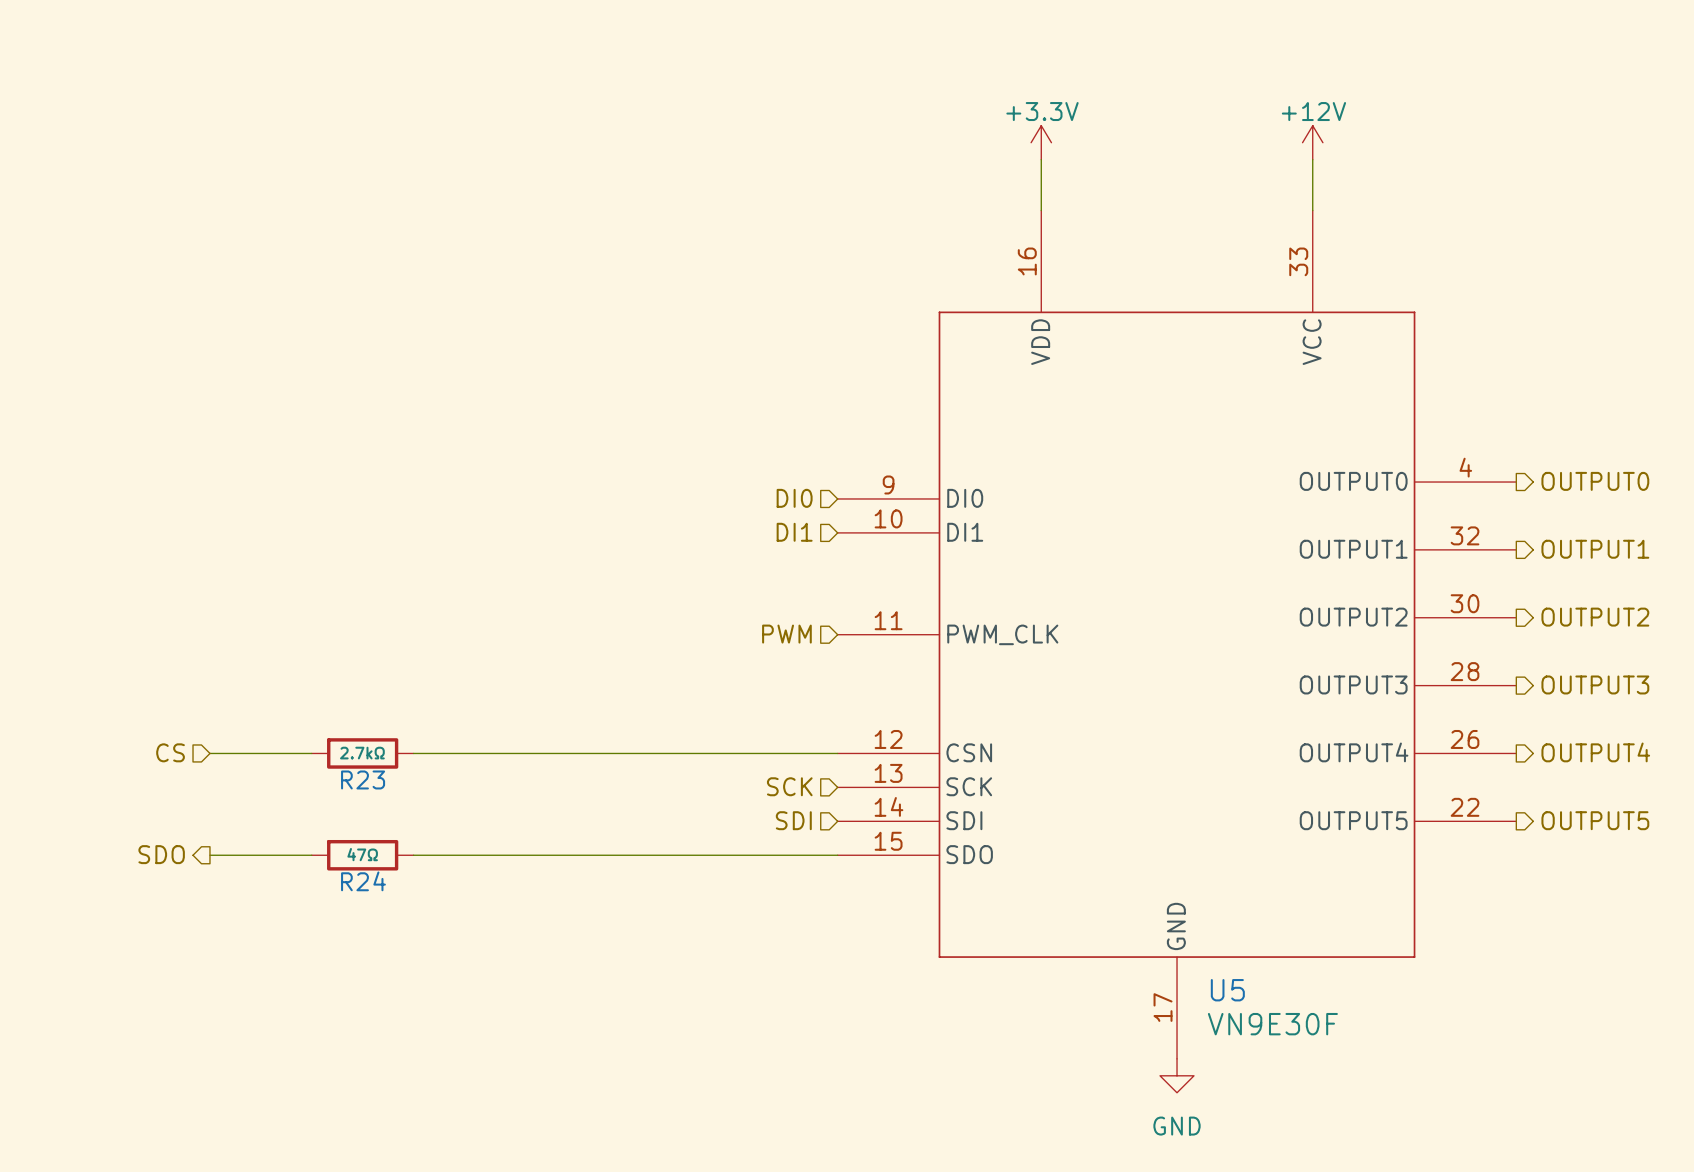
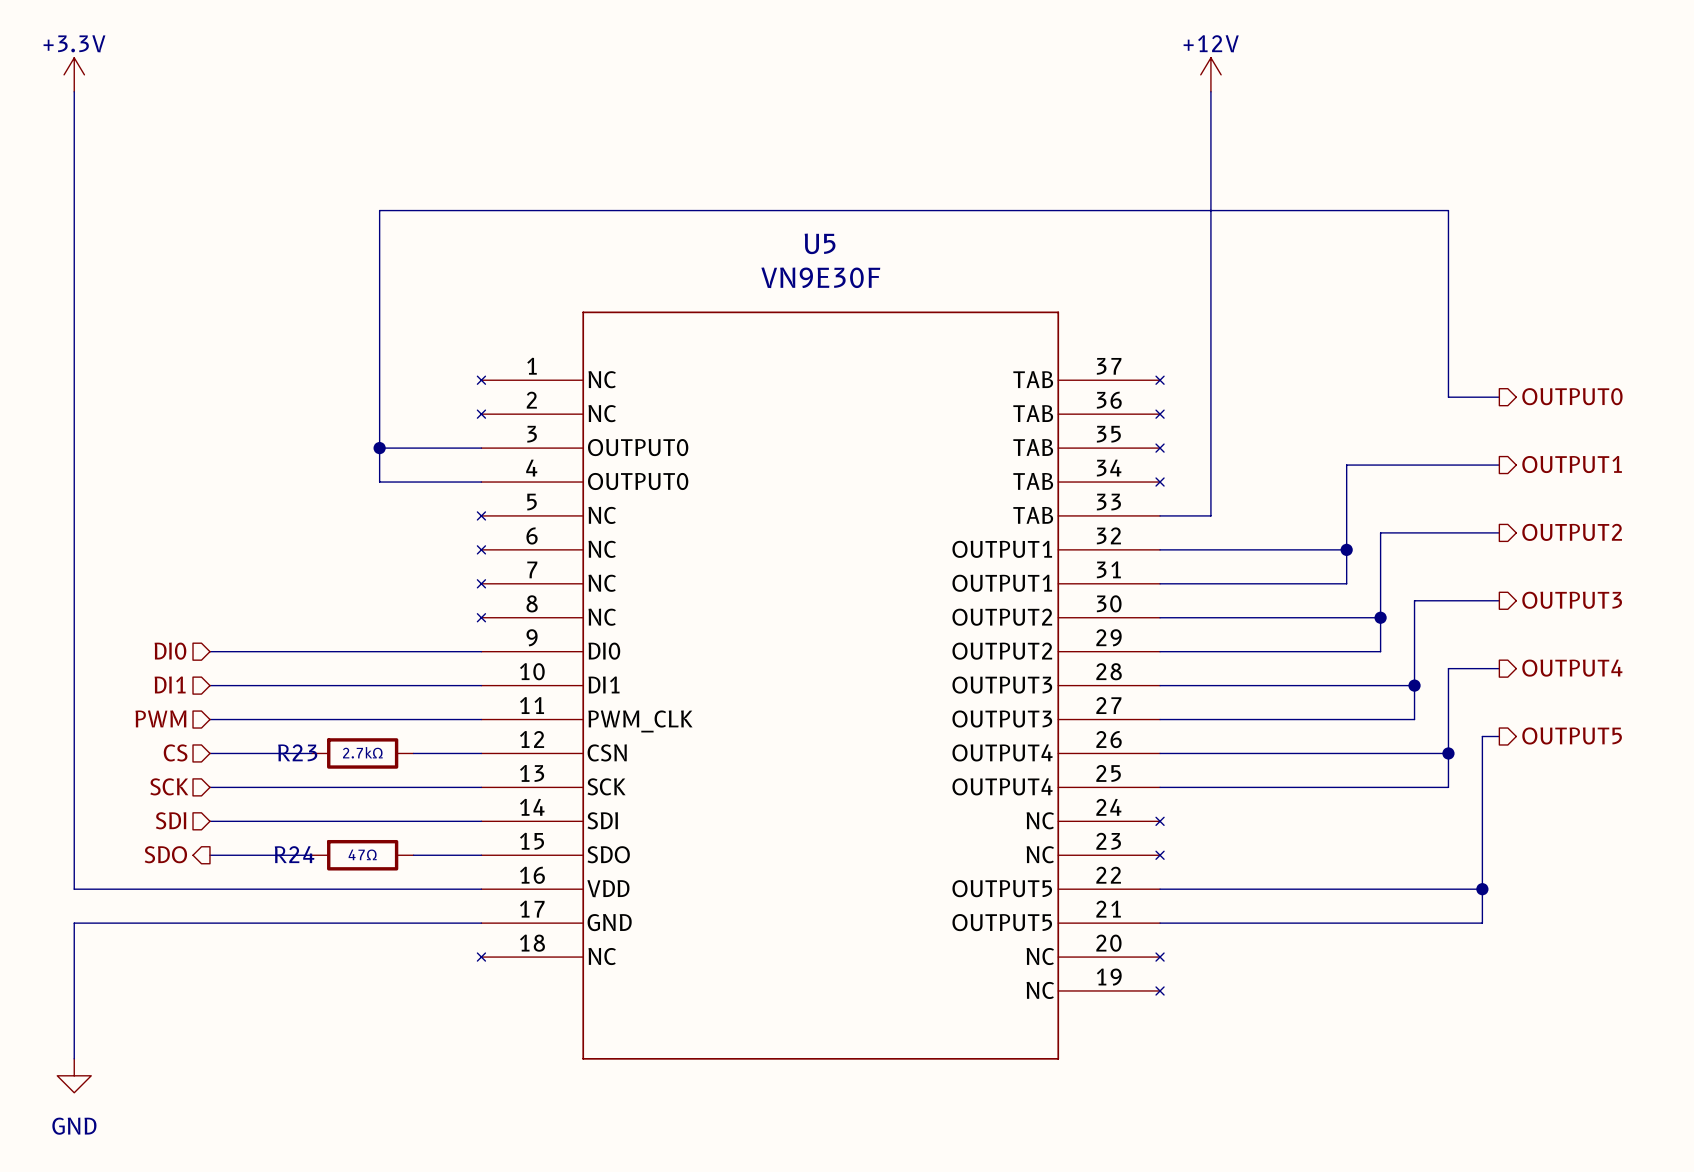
power symbol: none -> +3.3V (74, 74)
wire: none -> (74, 91) (74, 889) (481, 889)
wire: none -> (1210, 91) (1210, 515) (1160, 515)
power symbol: +3.3V (1041, 142) -> none
power symbol position: +12V (1312, 142) -> +12V (1210, 74)
wire: (1041, 159) (1041, 210) -> none
wire: (1312, 159) (1312, 210) -> none
U5 symbol: [837, 210, 1517, 1059] -> [477, 311, 1165, 1060]
wire: none -> (1499, 397) (1448, 397) (1448, 210) (379, 210) (379, 482) (481, 482)
wire: none -> (379, 448) (481, 448)
junction: none -> (379, 448)
wire: none -> (1499, 465) (1346, 465) (1346, 583) (1160, 583)
hierarchical label position: OUTPUT0 (1595, 481) -> OUTPUT0 (1572, 396)
hierarchical label: DI0 (794, 498) -> none
hierarchical label: DI1 (794, 532) -> none
wire: none -> (1499, 532) (1380, 532) (1380, 651) (1160, 651)
wire: none -> (1160, 549) (1346, 549)
junction: none -> (1346, 549)
hierarchical label position: OUTPUT1 (1595, 549) -> OUTPUT1 (1572, 464)
wire: none -> (1499, 600) (1414, 600) (1414, 719) (1160, 719)
wire: none -> (1160, 617) (1380, 617)
junction: none -> (1380, 617)
hierarchical label position: OUTPUT2 (1595, 617) -> OUTPUT2 (1572, 532)
hierarchical label: PWM (786, 634) -> none
hierarchical label: none -> DI0 (170, 651)
wire: none -> (209, 651) (481, 651)
wire: none -> (1499, 668) (1448, 668) (1448, 787) (1160, 787)
hierarchical label: none -> DI1 (170, 684)
hierarchical label position: OUTPUT3 (1595, 684) -> OUTPUT3 (1572, 600)
wire: none -> (209, 685) (481, 685)
wire: none -> (1160, 685) (1414, 685)
junction: none -> (1414, 685)
hierarchical label: none -> PWM (160, 718)
wire: none -> (209, 719) (481, 719)
wire: none -> (1499, 736) (1482, 736) (1482, 923) (1160, 923)
hierarchical label position: OUTPUT4 (1595, 752) -> OUTPUT4 (1572, 668)
wire: (481, 753) (837, 753) -> none
wire: none -> (1160, 753) (1448, 753)
junction: none -> (1448, 753)
R23 name position: R23 (363, 779) -> R23 (297, 752)
hierarchical label: none -> SCK (169, 786)
hierarchical label: SCK (789, 786) -> none
wire: none -> (209, 787) (481, 787)
hierarchical label: none -> SDI (171, 820)
hierarchical label: SDI (793, 820) -> none
hierarchical label position: OUTPUT5 (1595, 820) -> OUTPUT5 (1572, 735)
wire: none -> (209, 821) (481, 821)
wire: (481, 855) (837, 855) -> none
R24 name position: R24 (363, 881) -> R24 (294, 854)
wire: none -> (1160, 889) (1482, 889)
junction: none -> (1482, 889)
wire: none -> (481, 923) (74, 923) (74, 1058)
U5 name position: U5 (1227, 990) -> U5 (820, 243)
U5 value position: VN9E30F (1272, 1024) -> VN9E30F (820, 277)
power symbol: none -> GND (74, 1075)
power symbol: GND (1177, 1075) -> none

